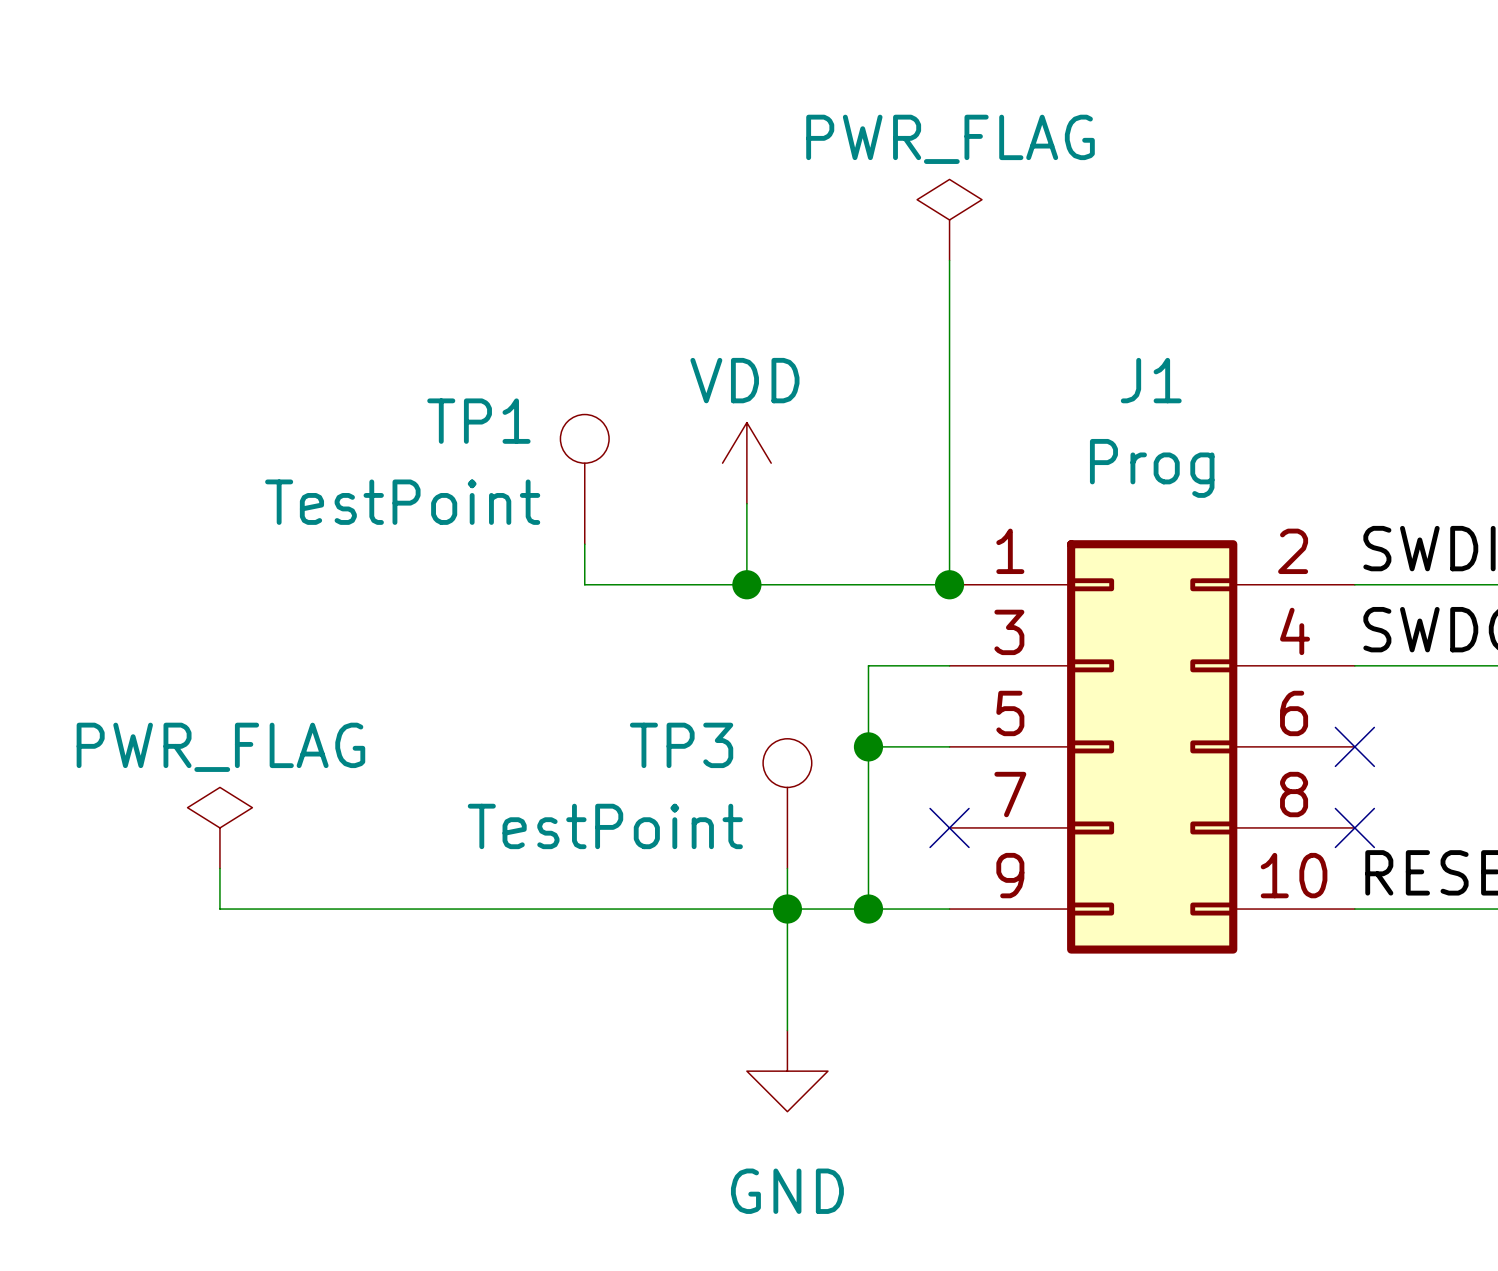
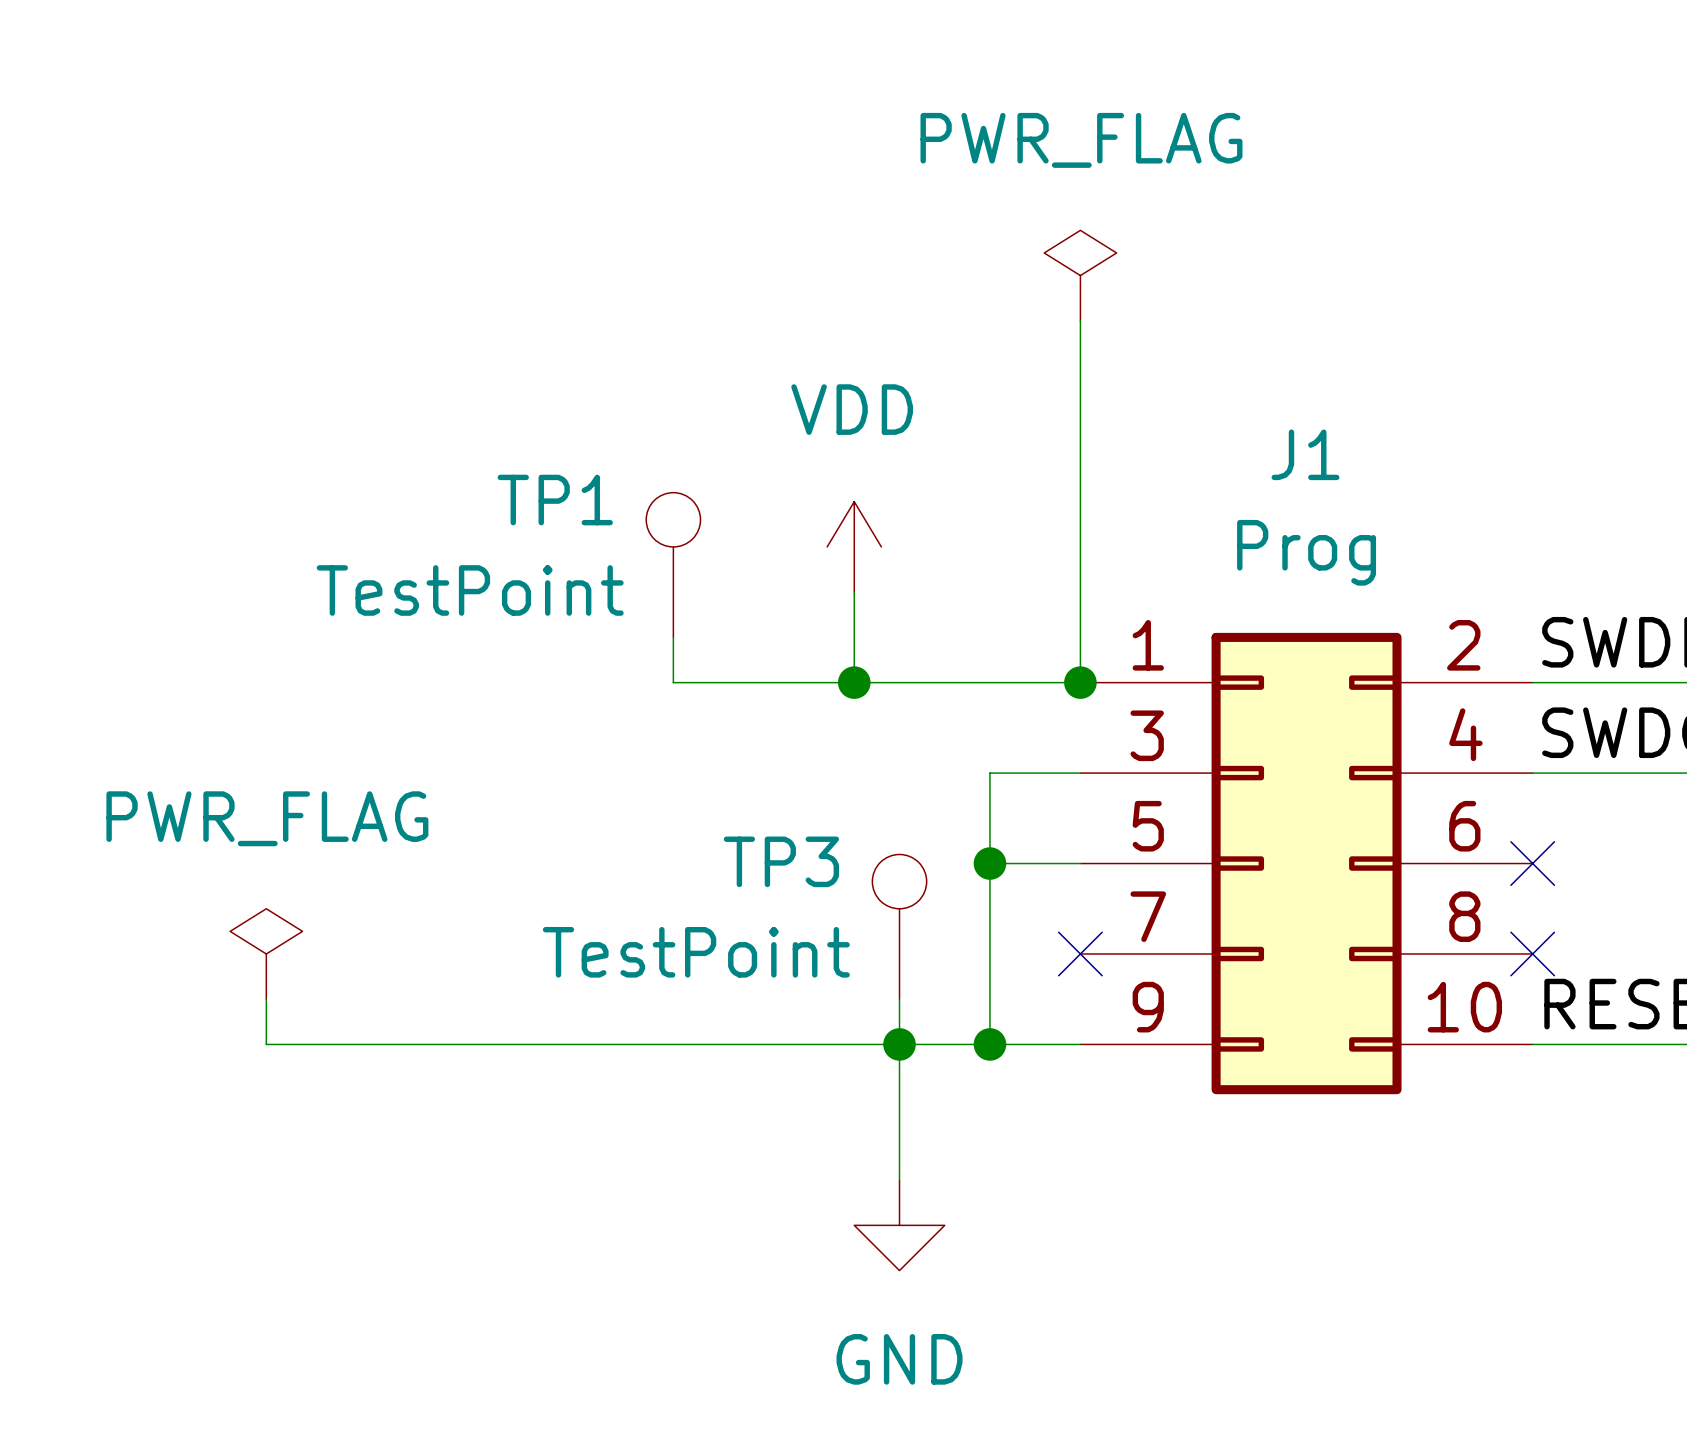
power symbol text position: PWR_FLAG (950, 139) -> PWR_FLAG (1081, 140)
power symbol text position: VDD (744, 380) -> VDD (852, 409)
power symbol text position: PWR_FLAG (220, 747) -> PWR_FLAG (267, 818)

